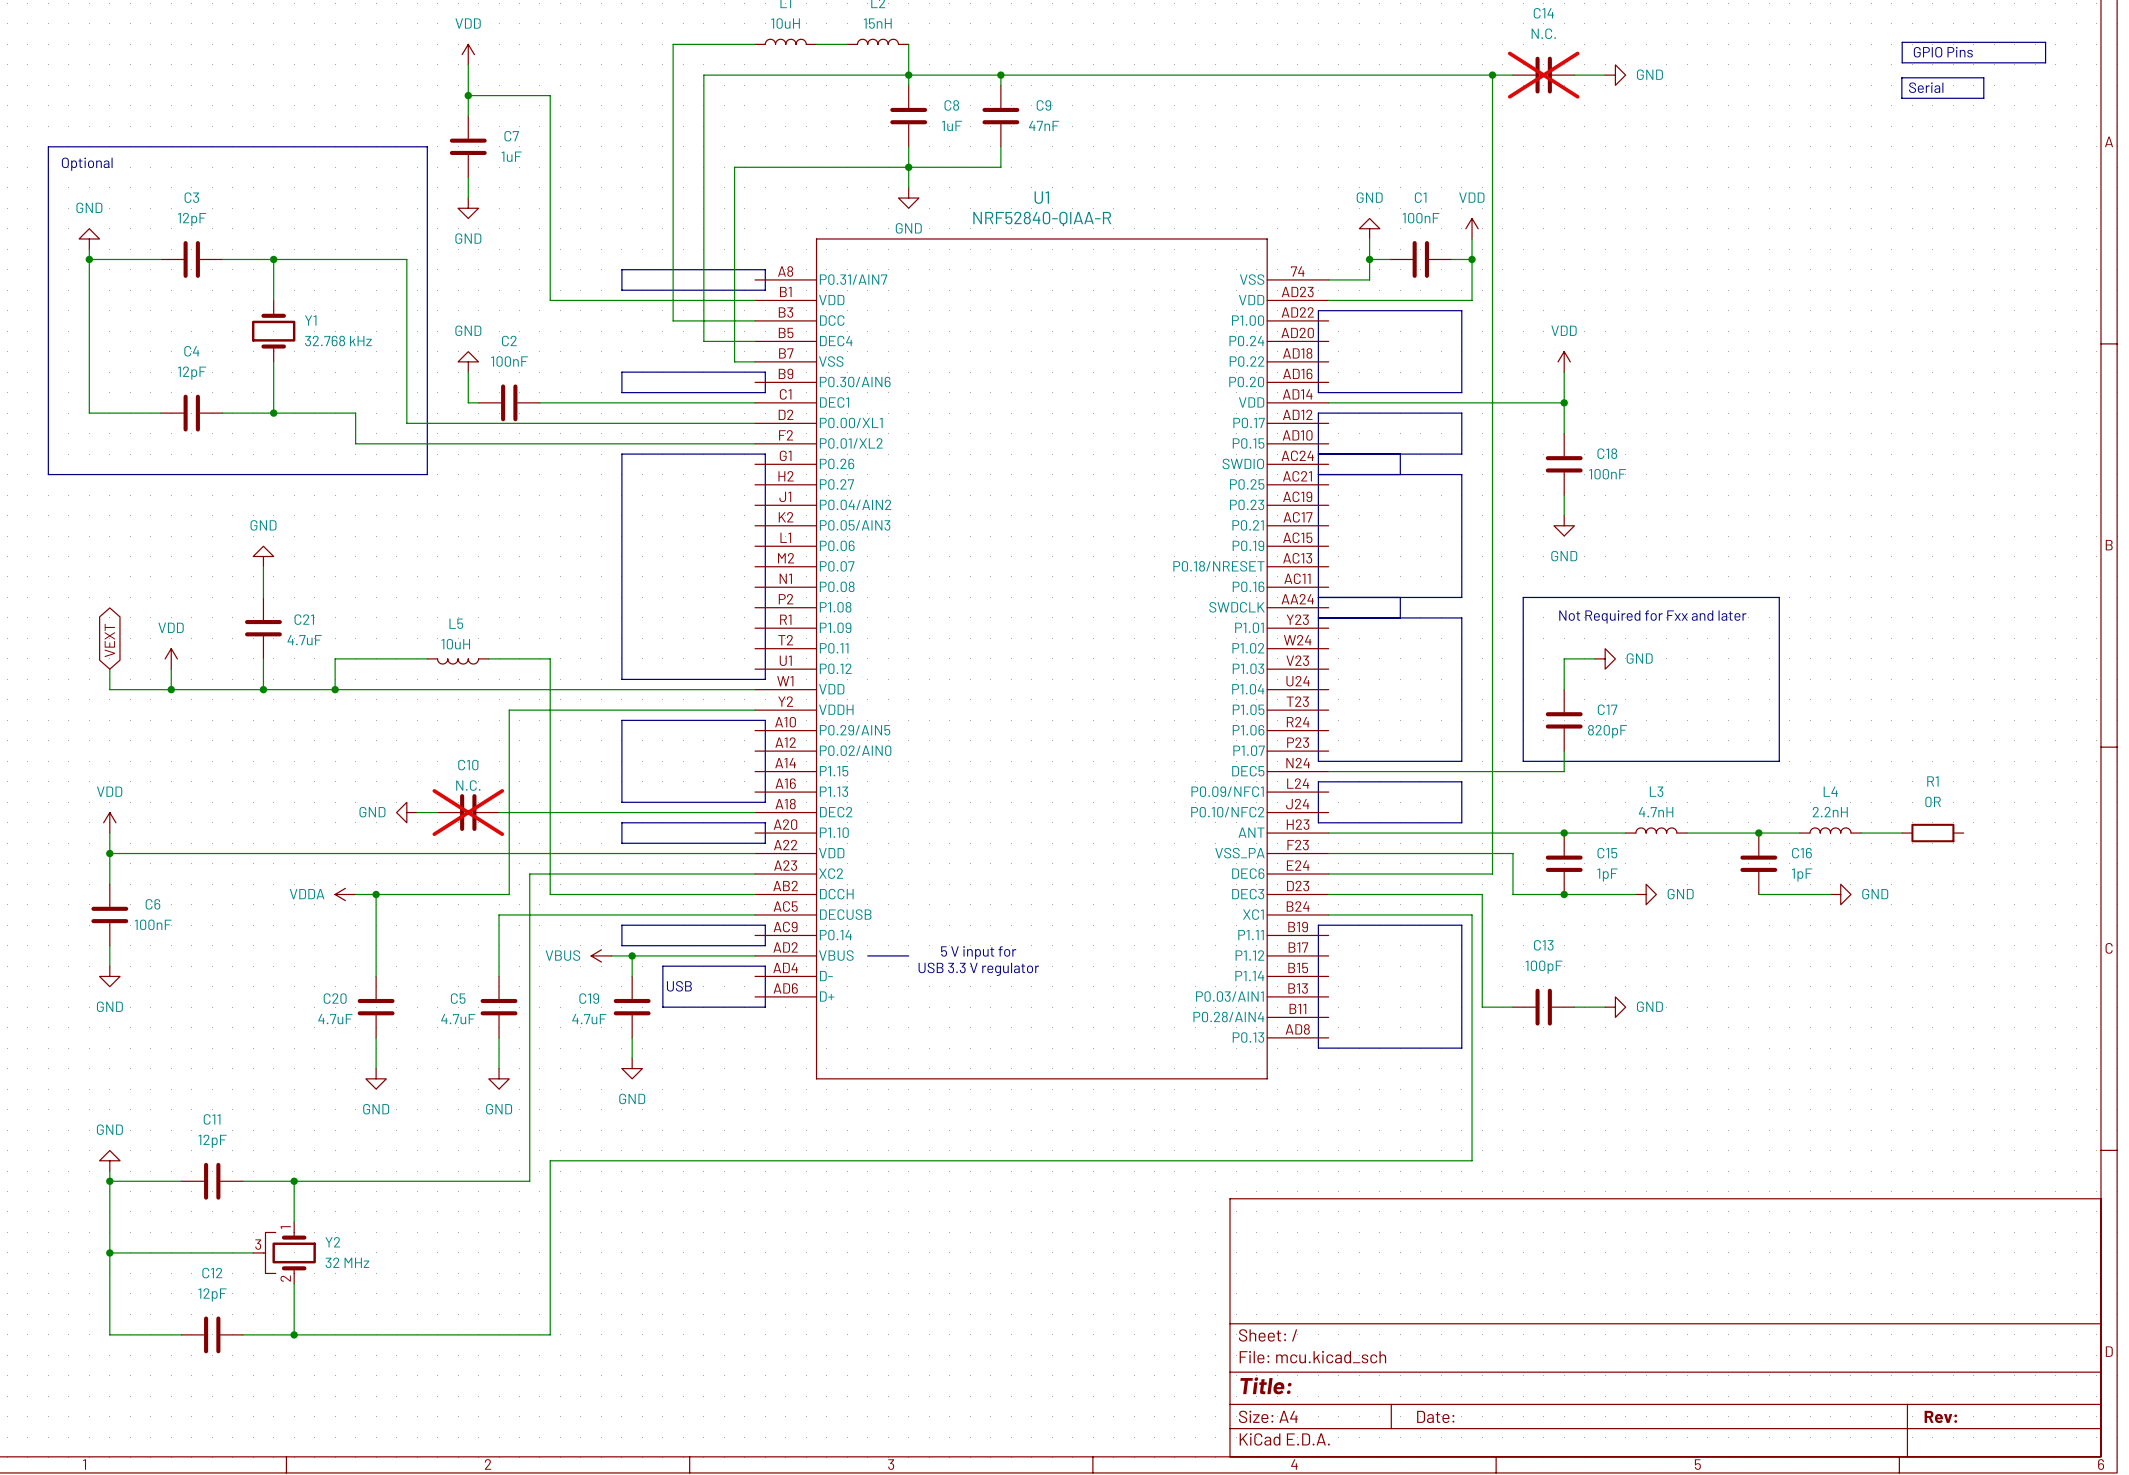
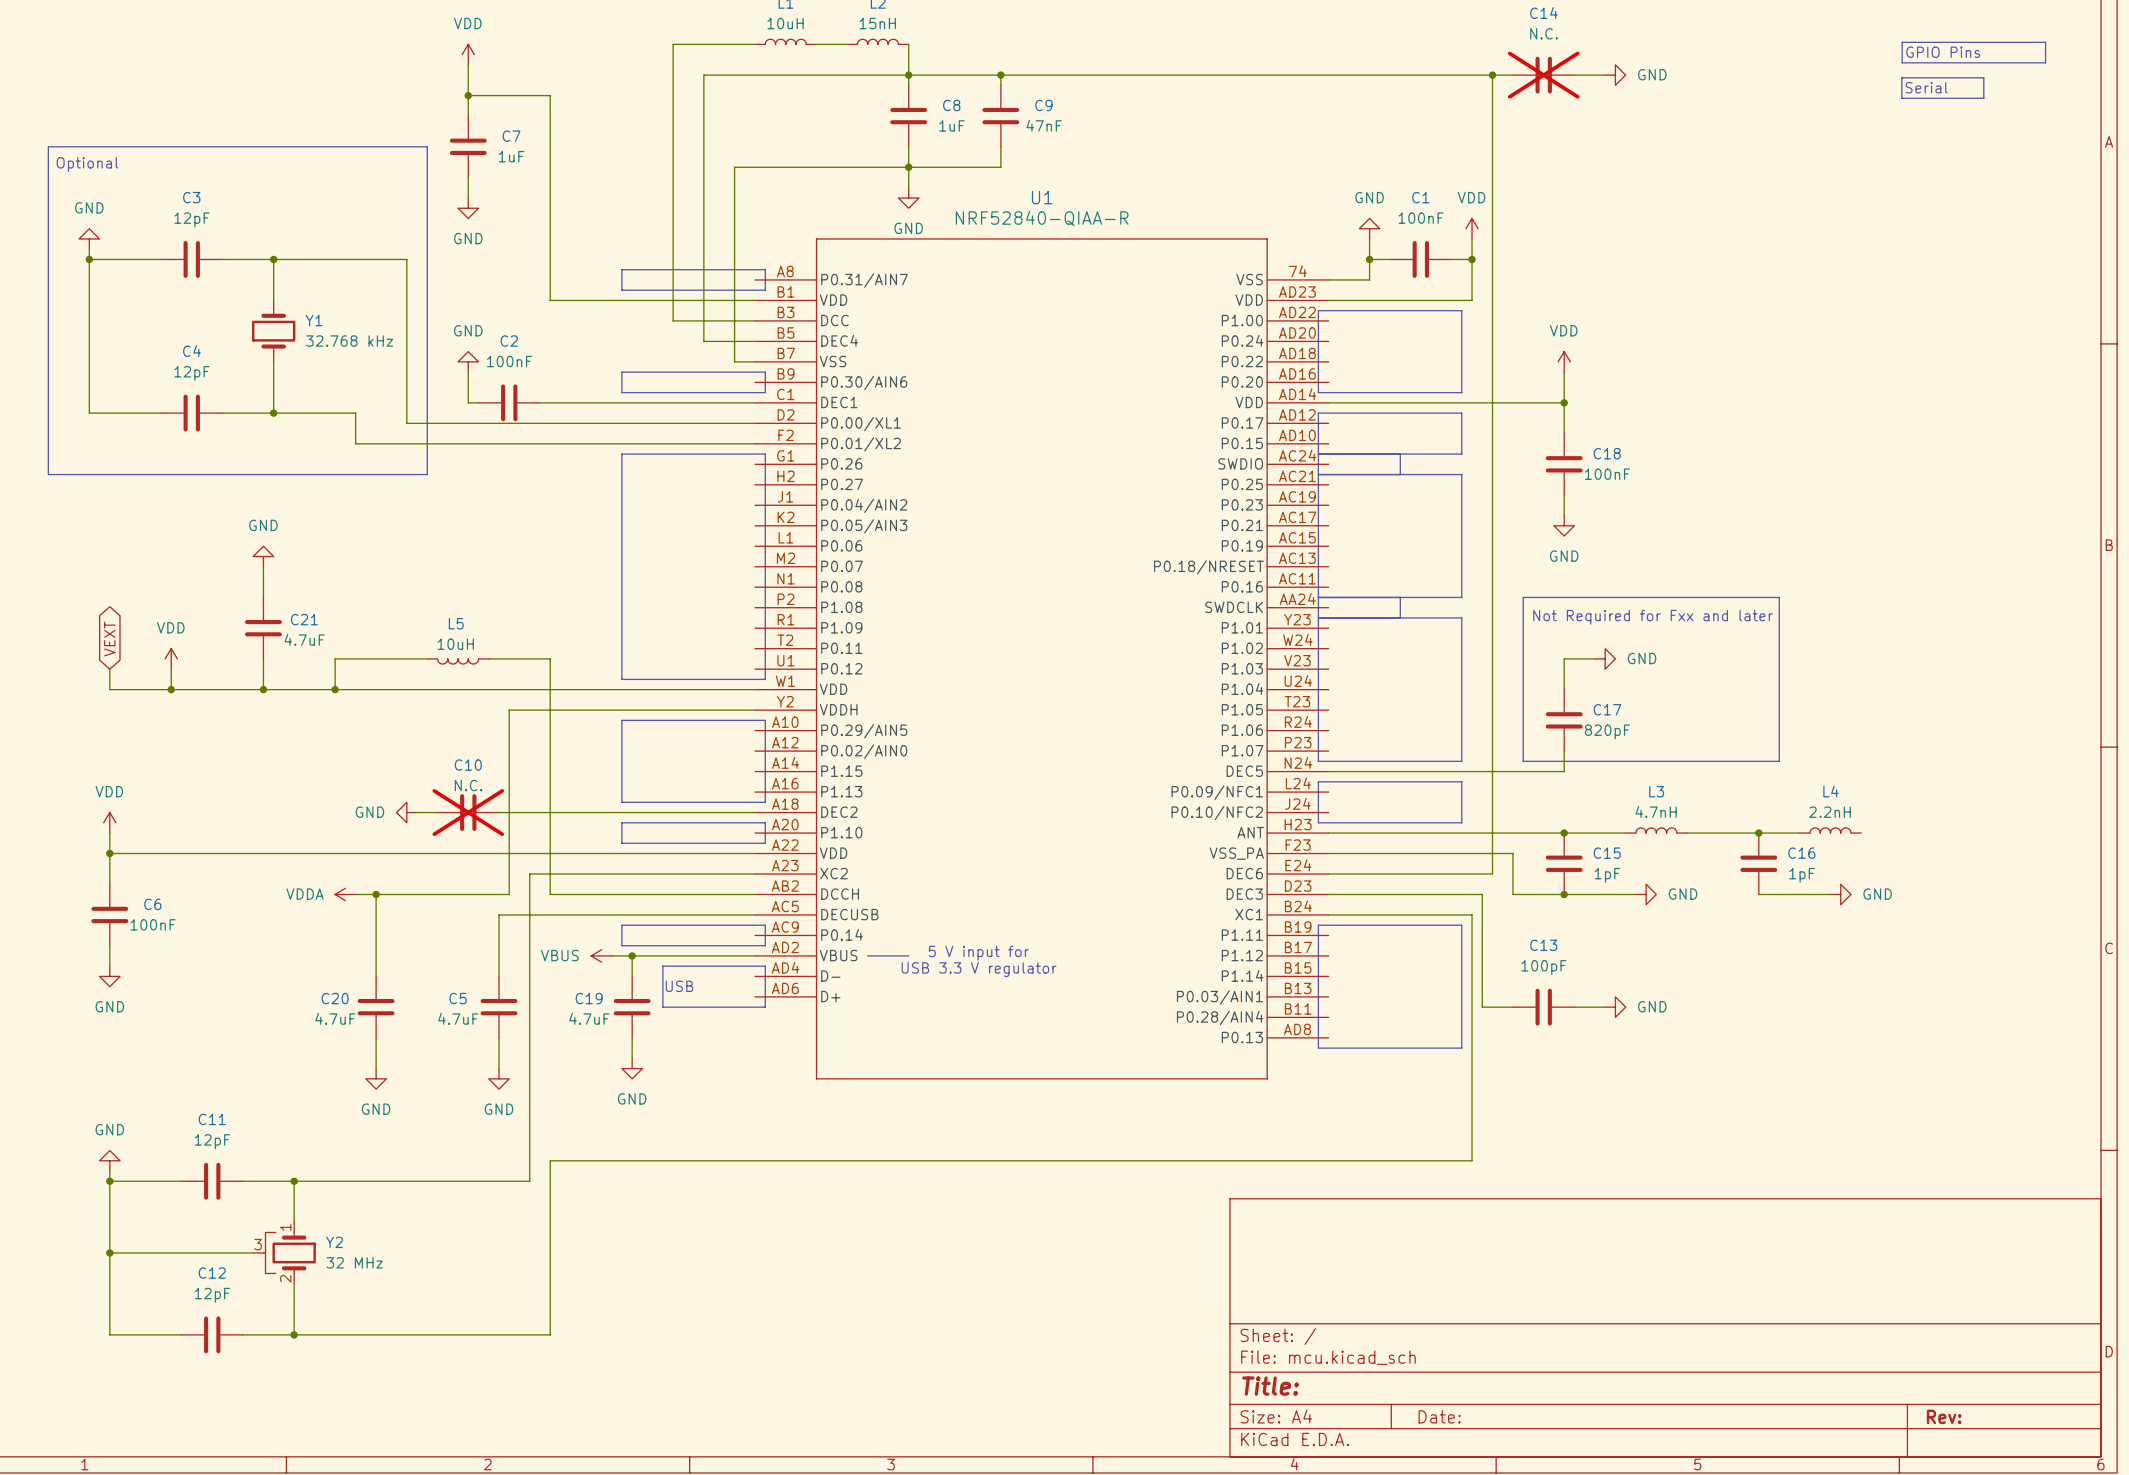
wire: (1861, 833) (1902, 833) -> none
R1: 0R (1932, 833) -> none

